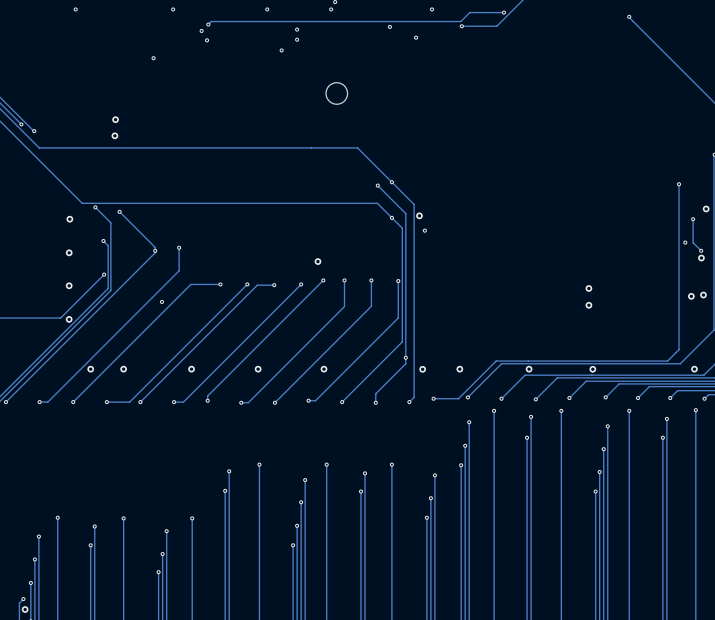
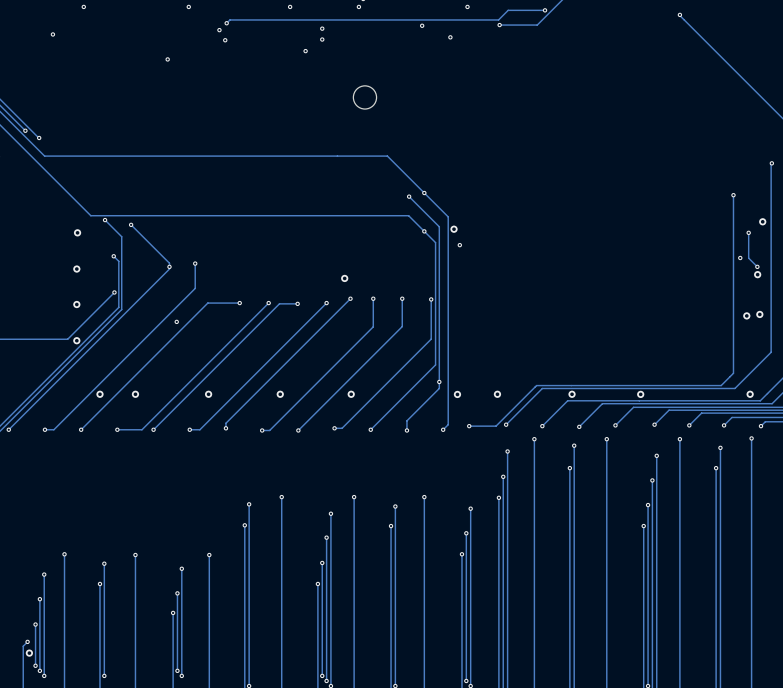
via: none -> (52, 34)
via: (115, 119) -> none
via: (114, 135) -> none
via: (588, 288) -> none
via: (588, 305) -> none

